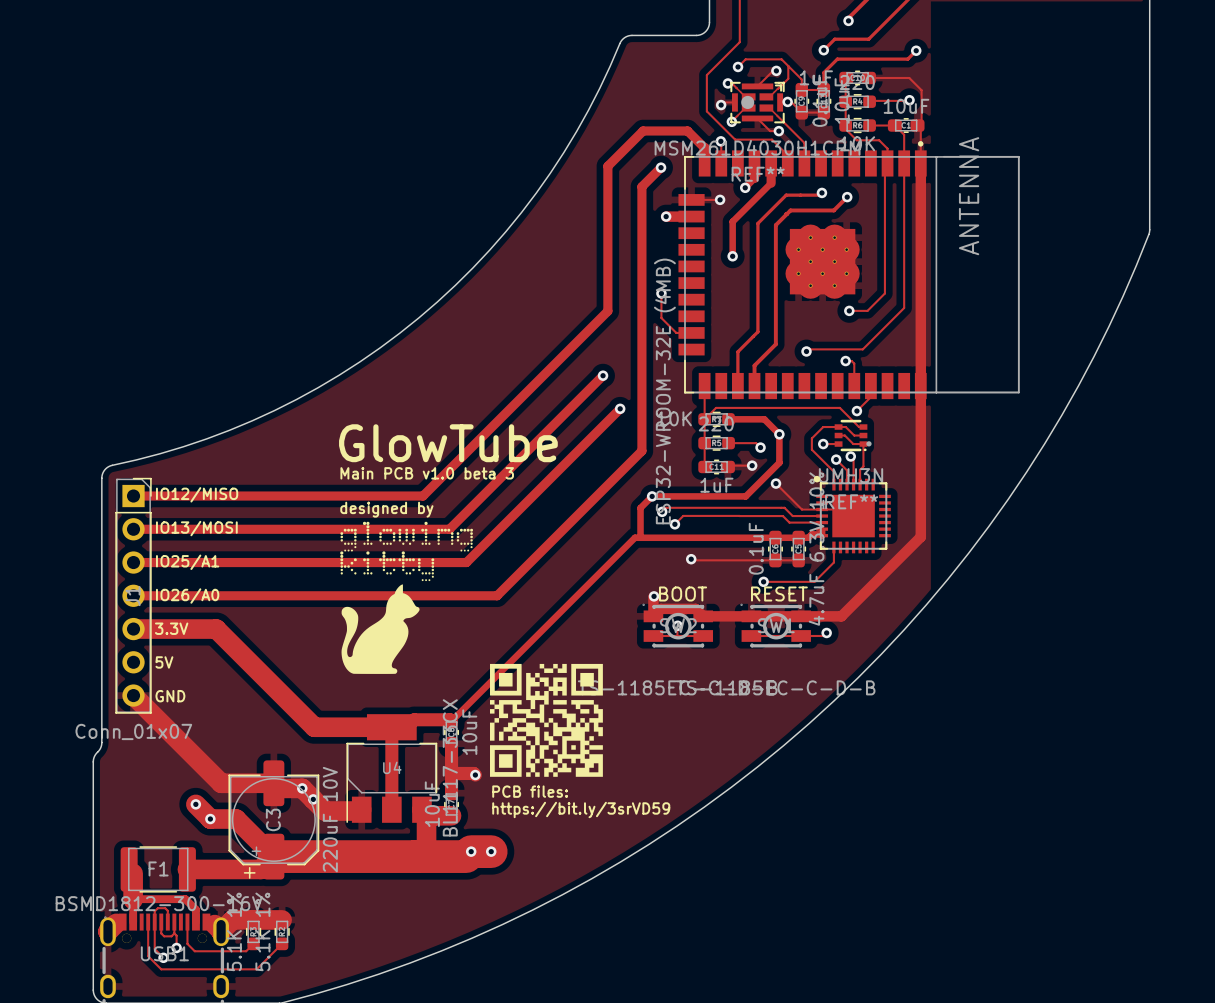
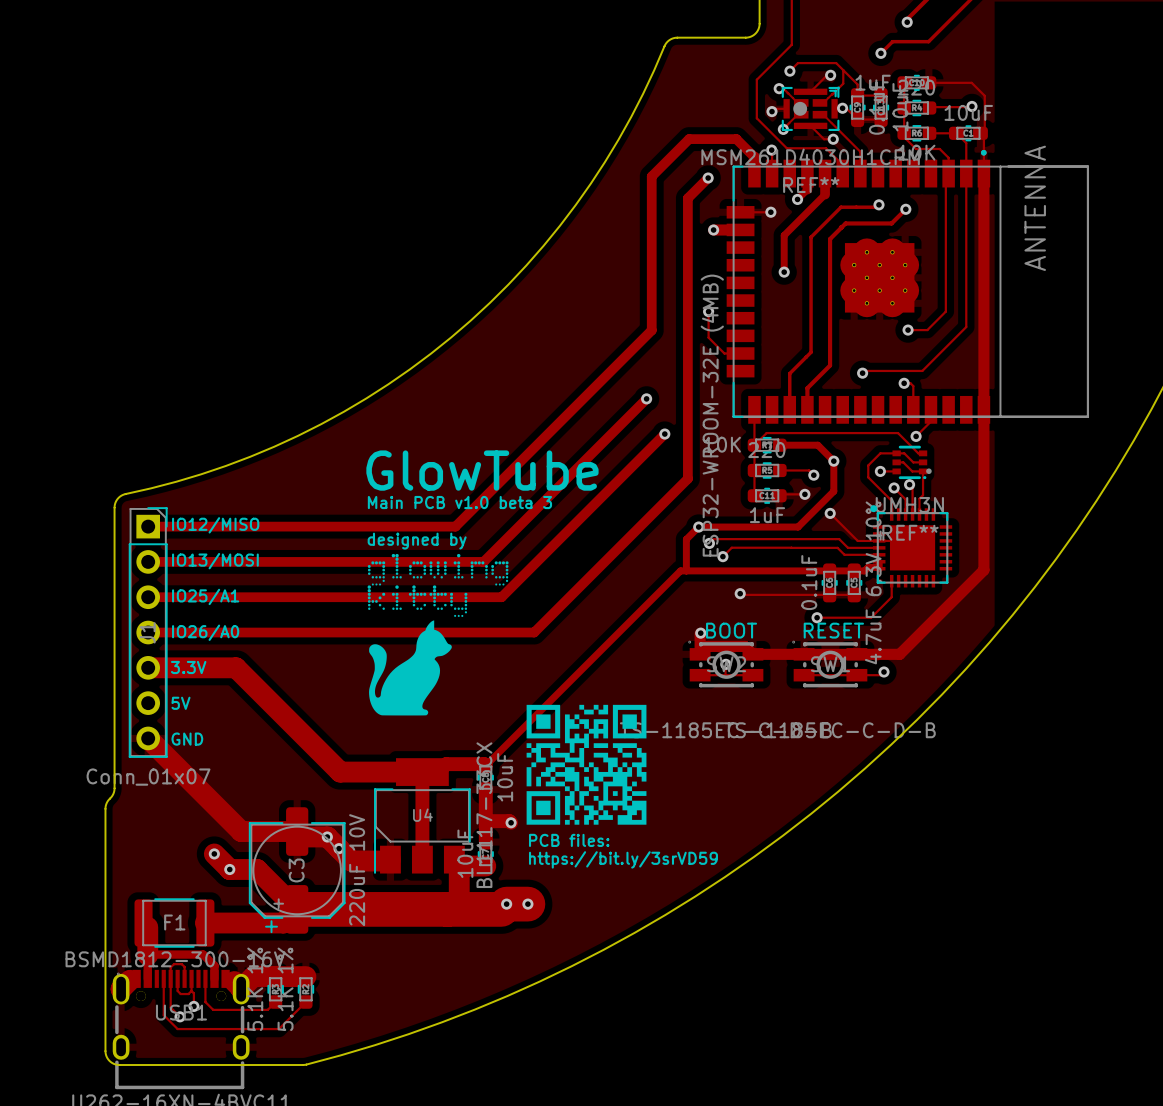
track: (916, 50) (907, 59) (837, 59) (823, 72) (823, 89) -> none
via: (916, 50) -> none

